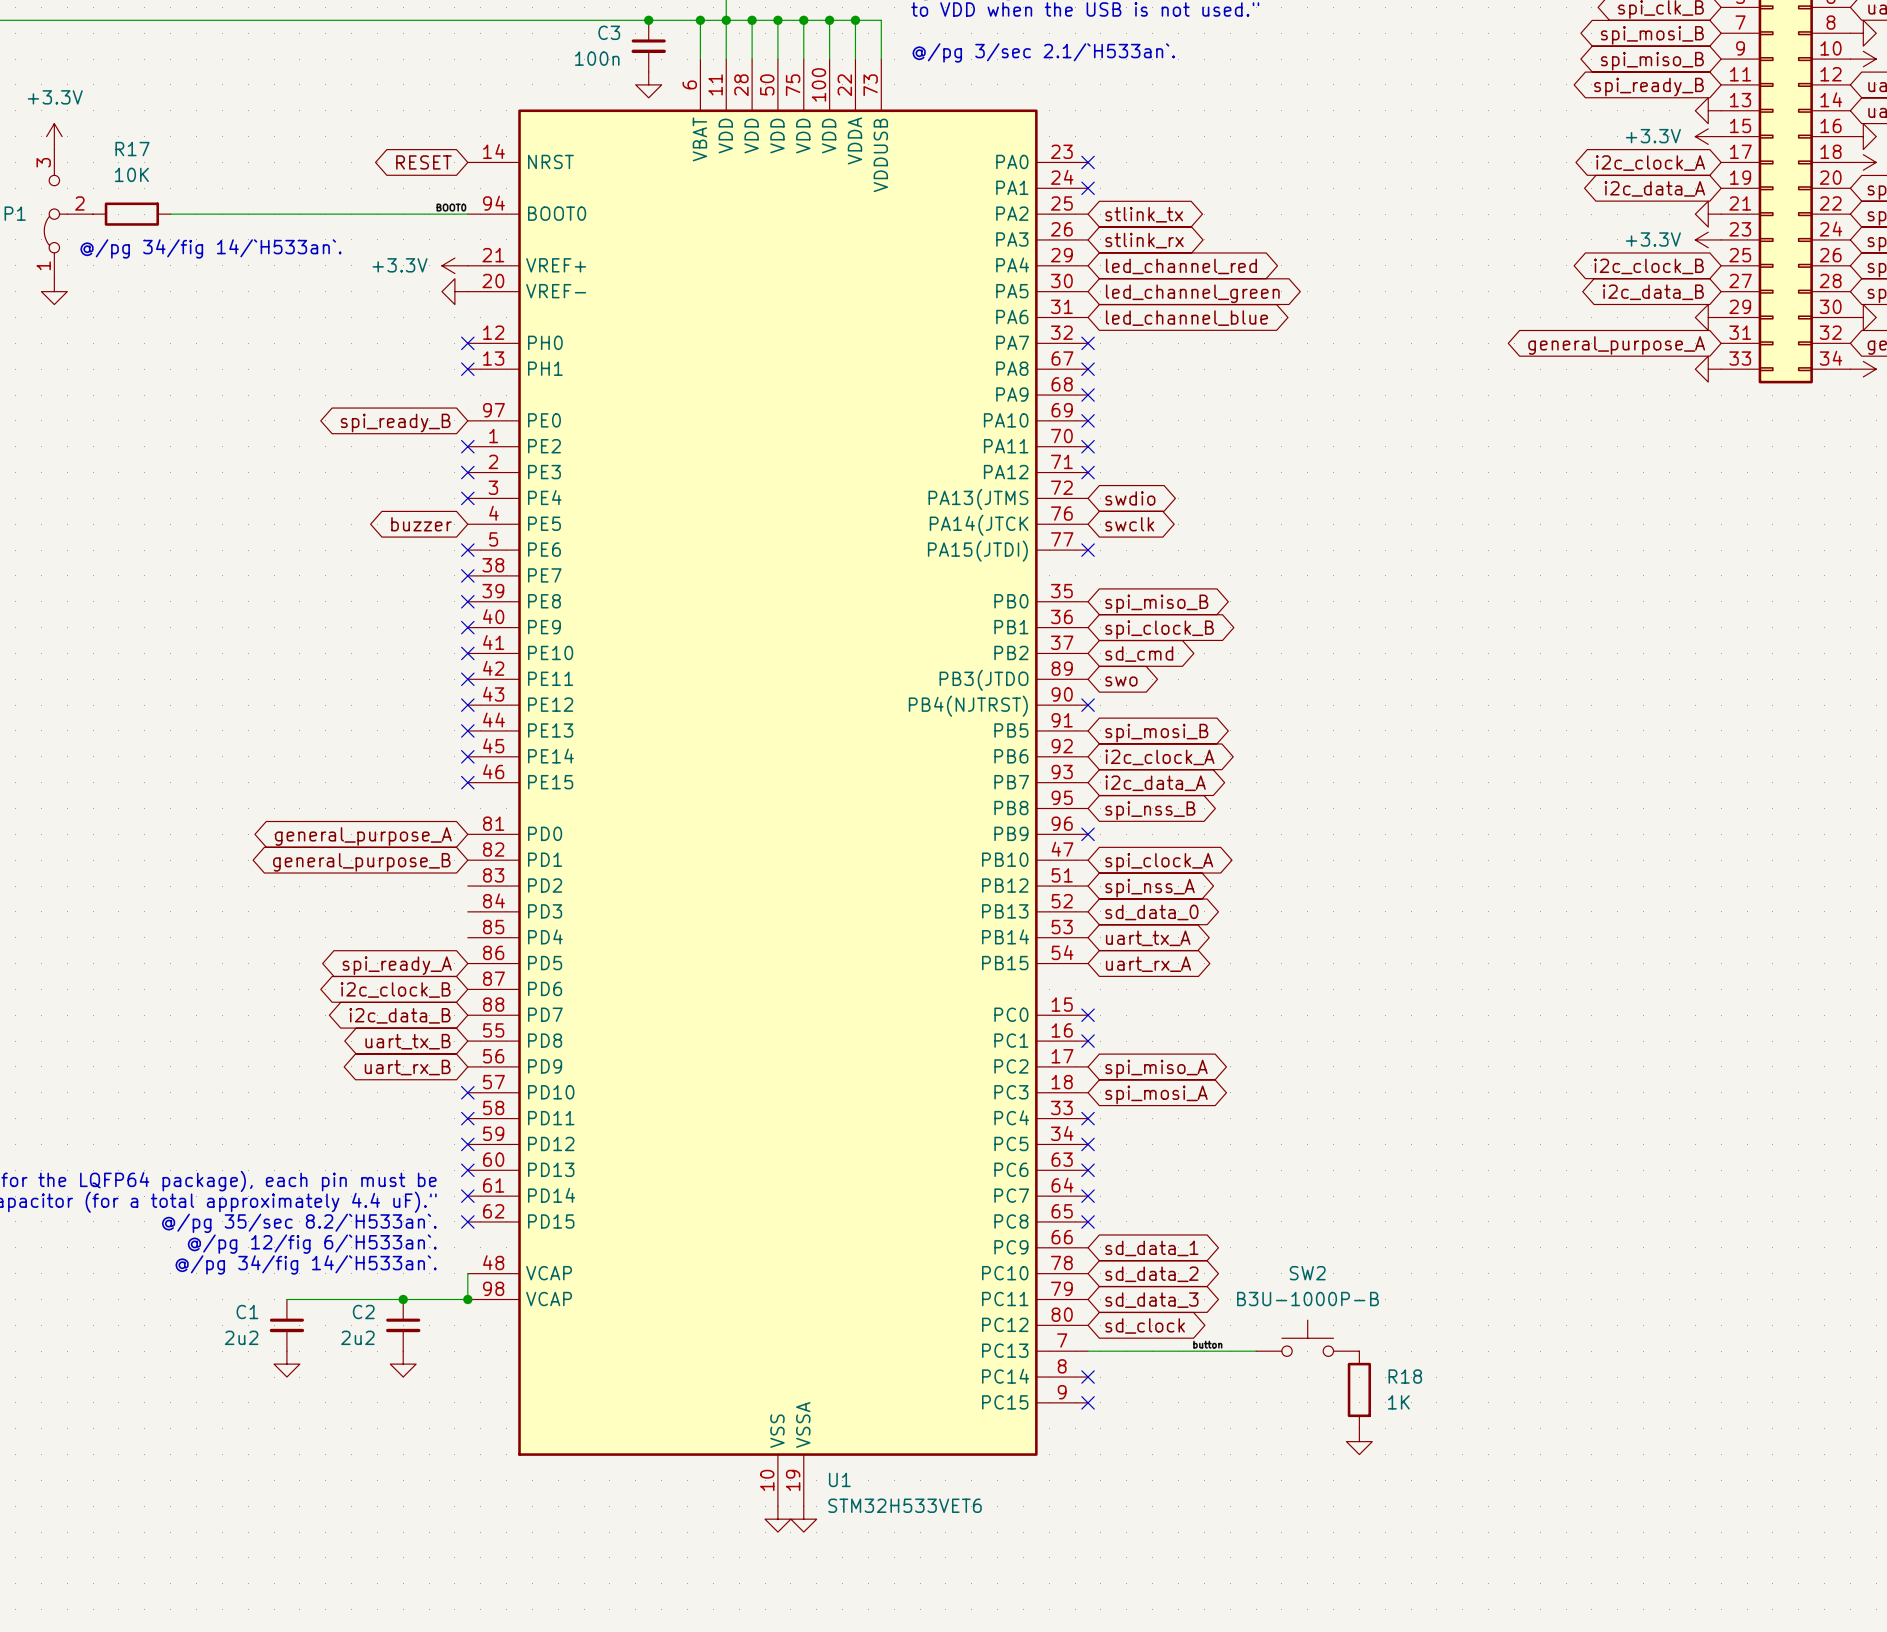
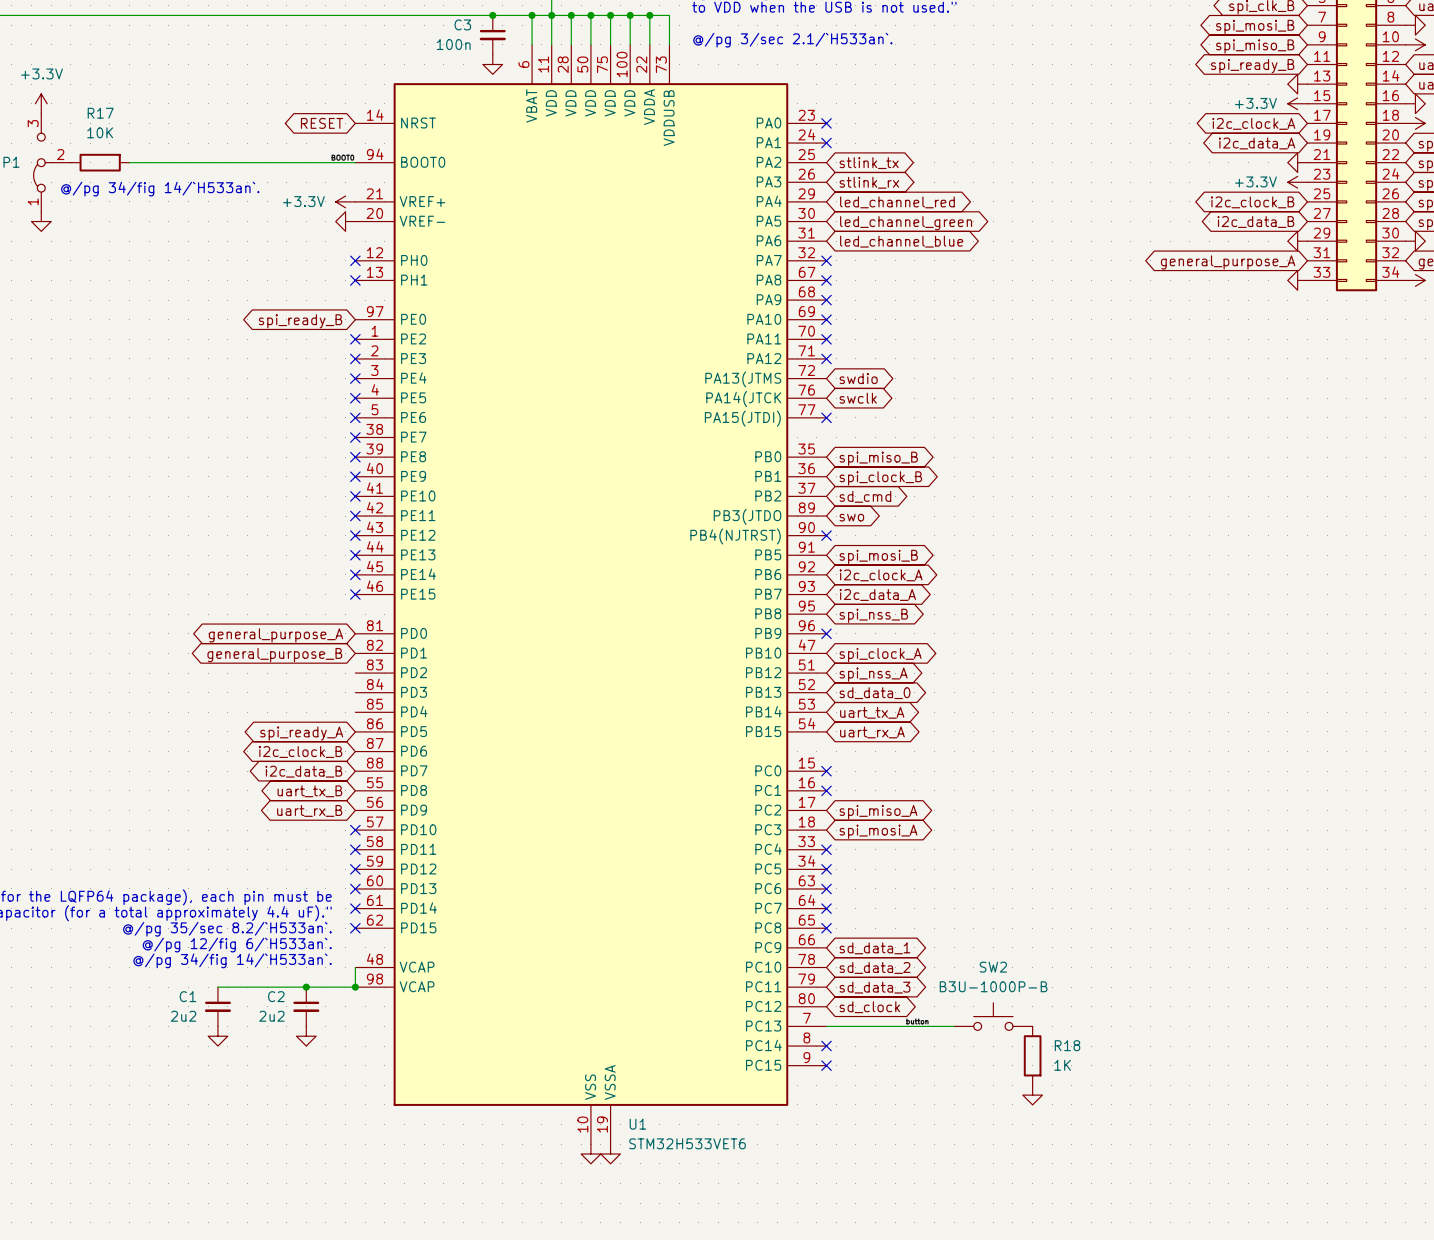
global label: buzzer (421, 524) -> none
no-connect mark: none -> (355, 398)

